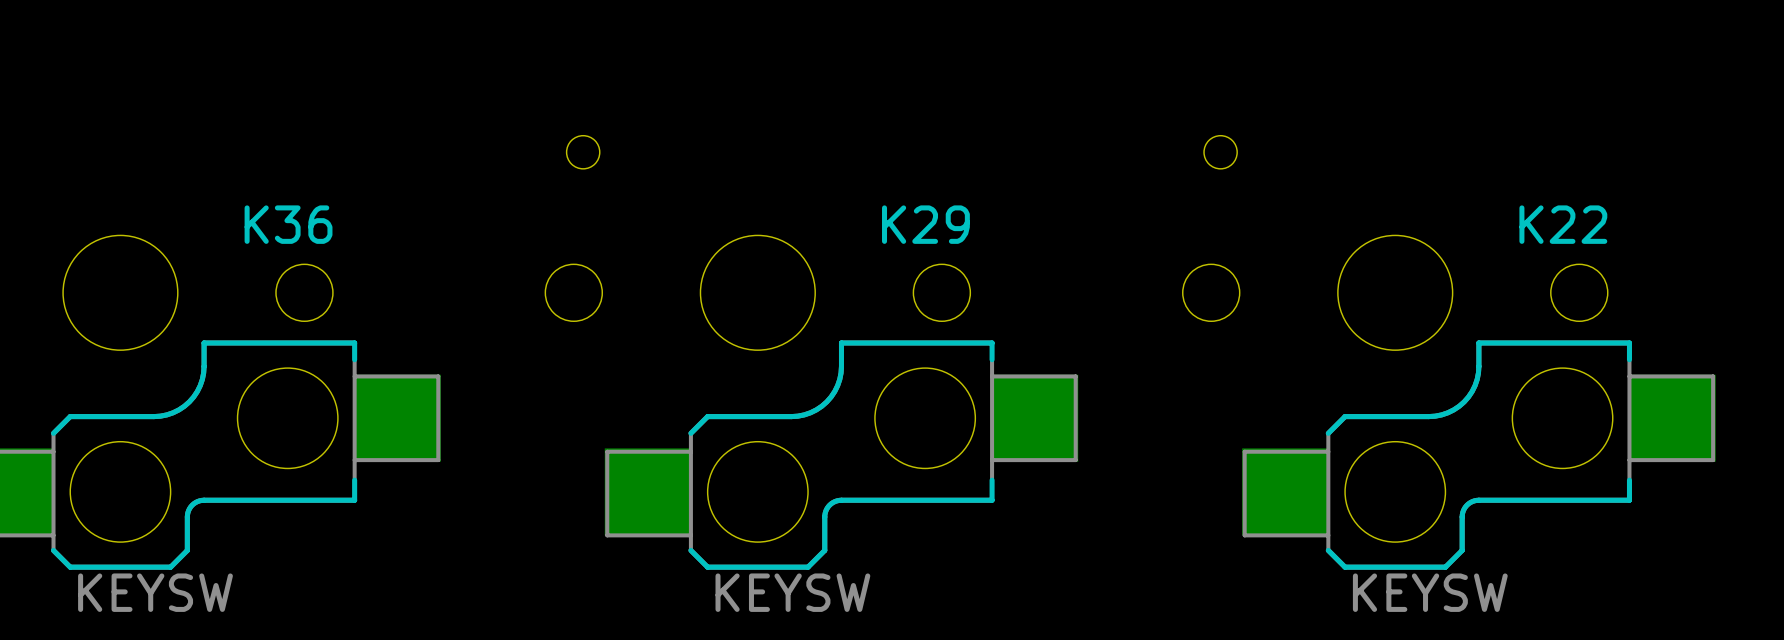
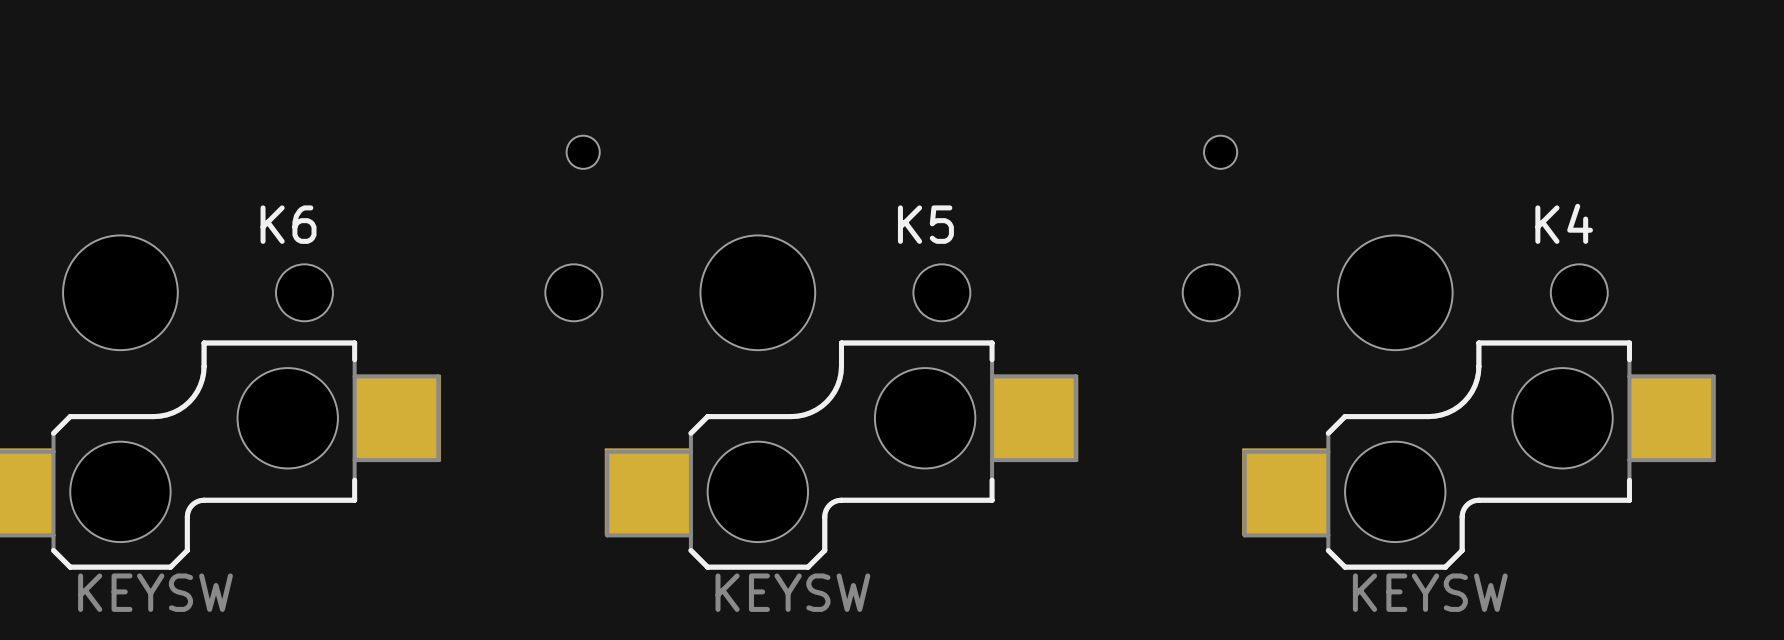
K36 name: K36 (288, 224) -> K6 (288, 224)
K29 name: K29 (925, 224) -> K5 (925, 224)
K22 name: K22 (1563, 224) -> K4 (1564, 223)

